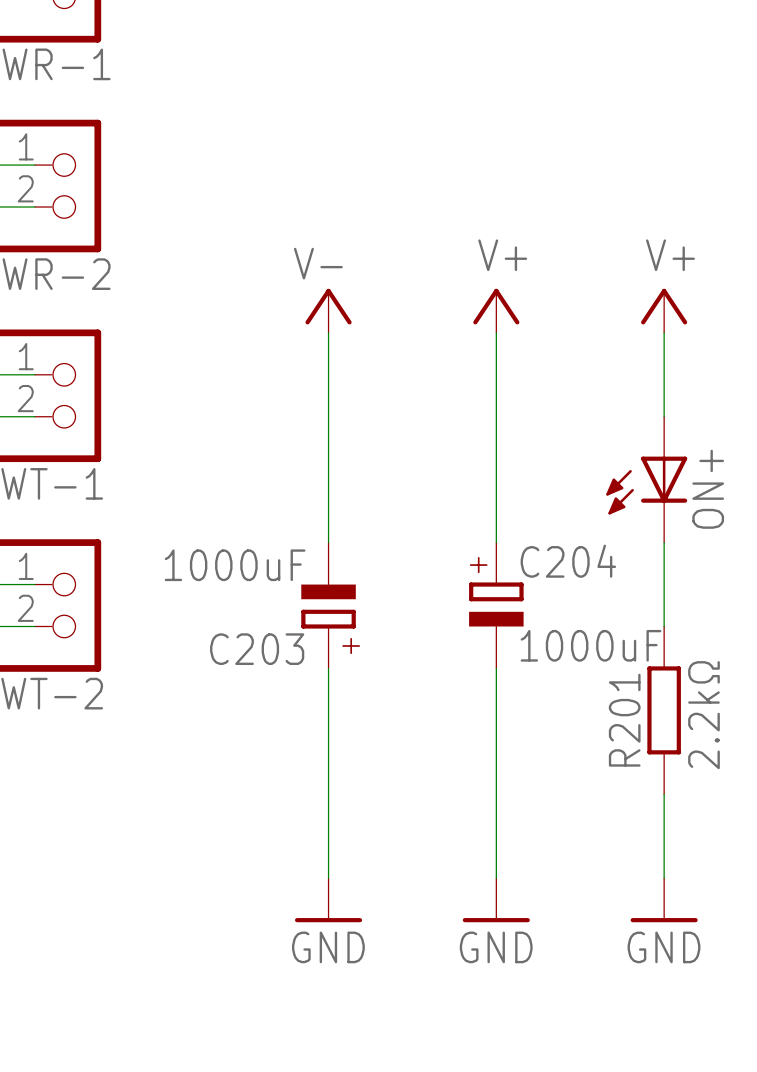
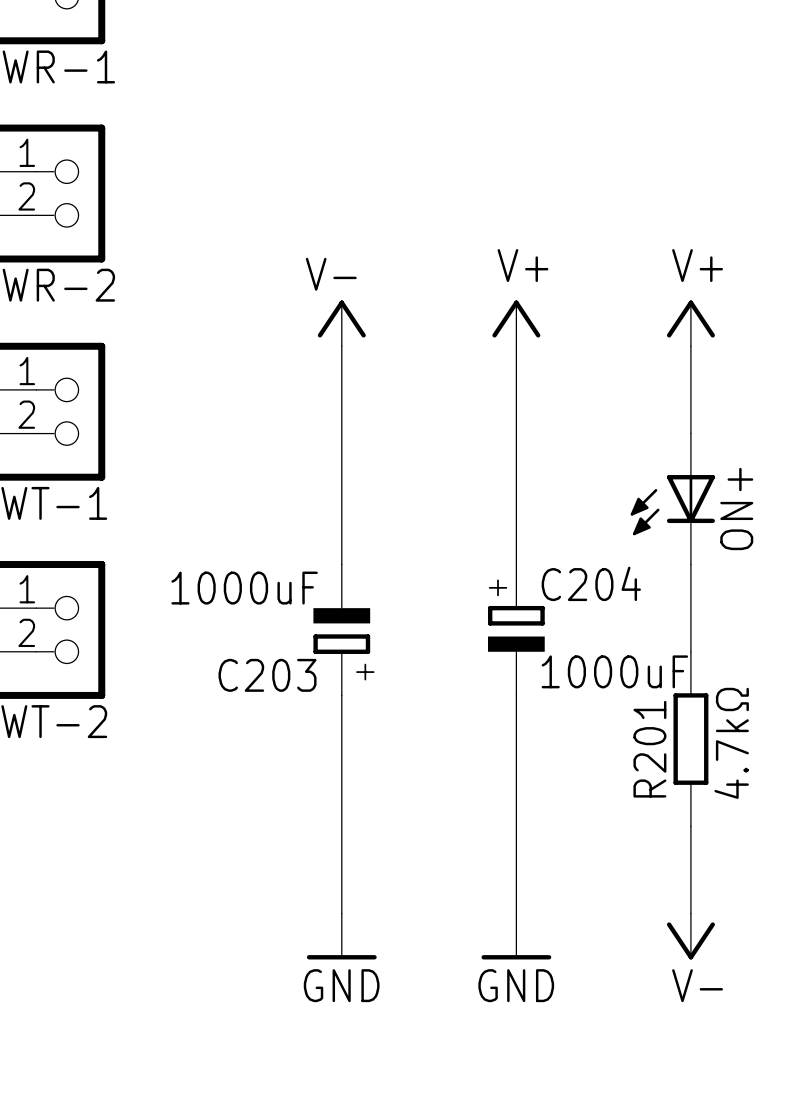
R201 value: 2.2kΩ (703, 715) -> 4.7kΩ (731, 743)
power symbol: GND (664, 900) -> V- (690, 936)

